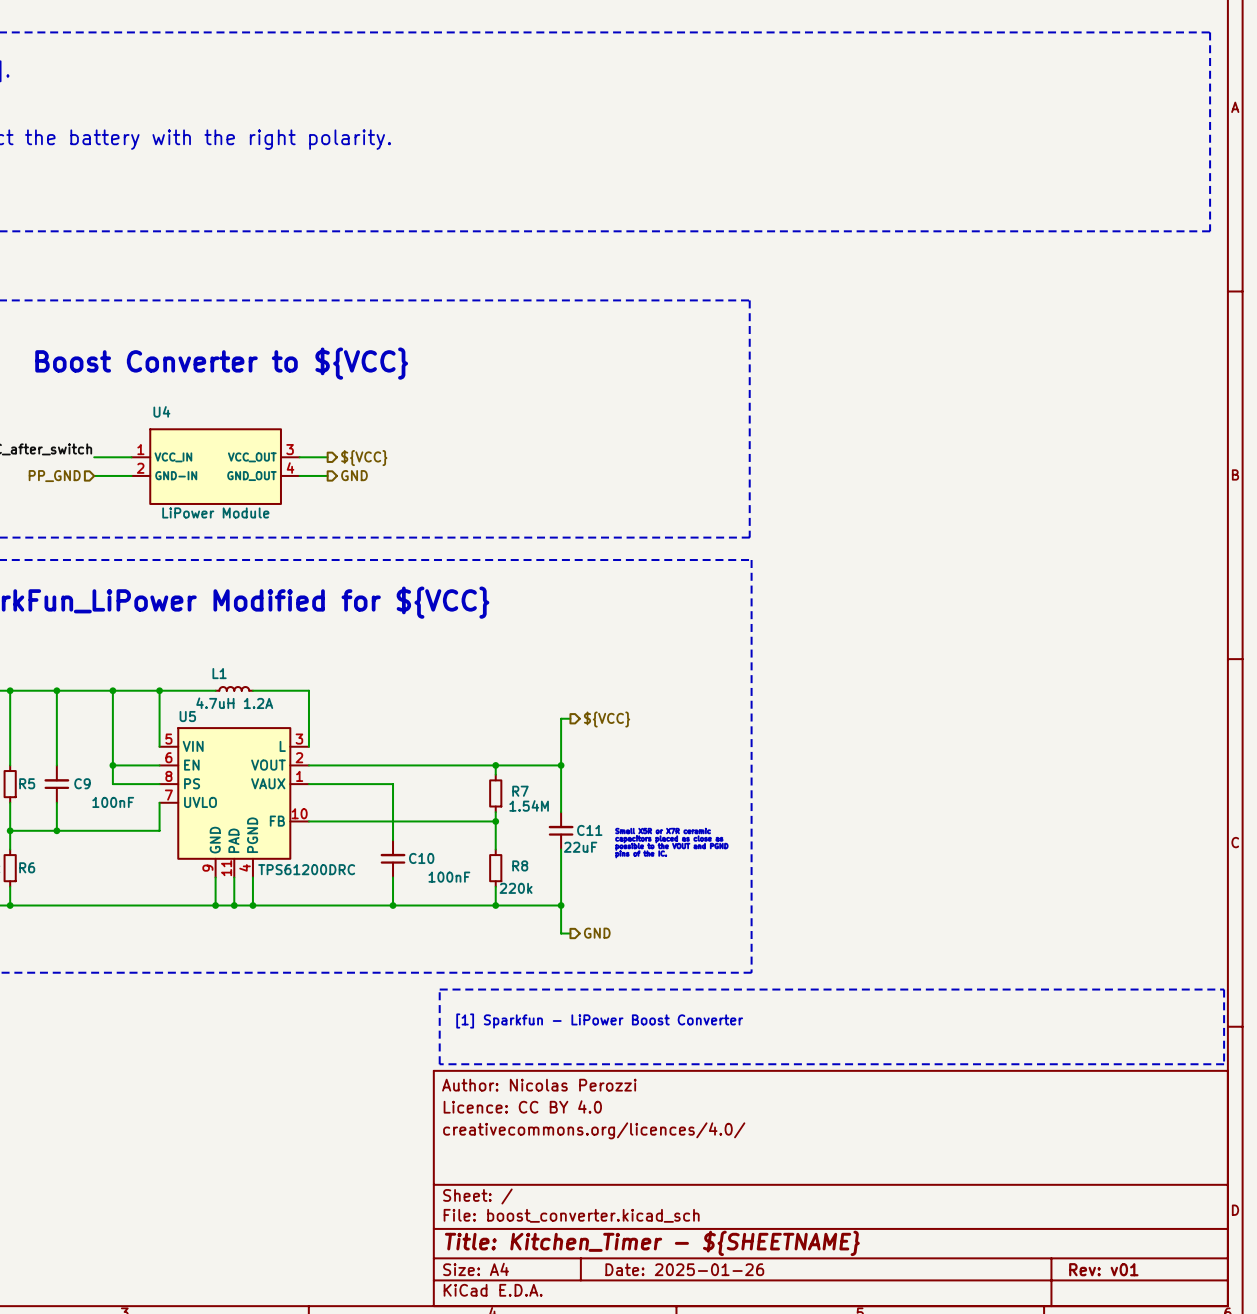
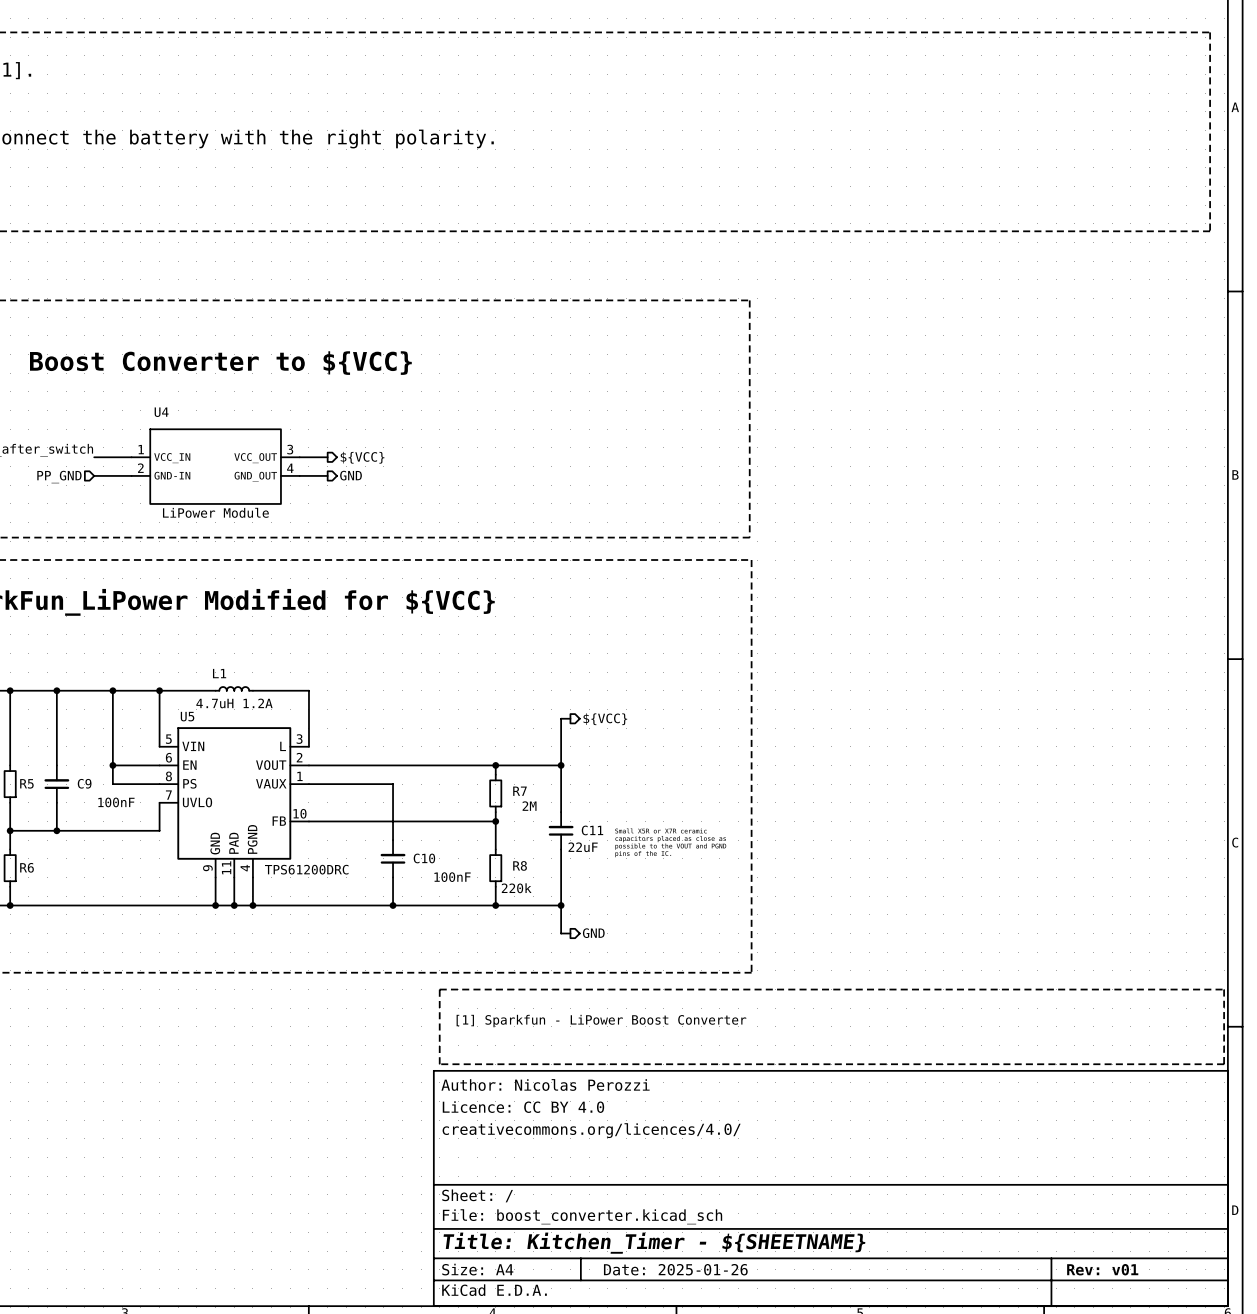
R7 value: 1.54M (529, 805) -> 2M (529, 806)

